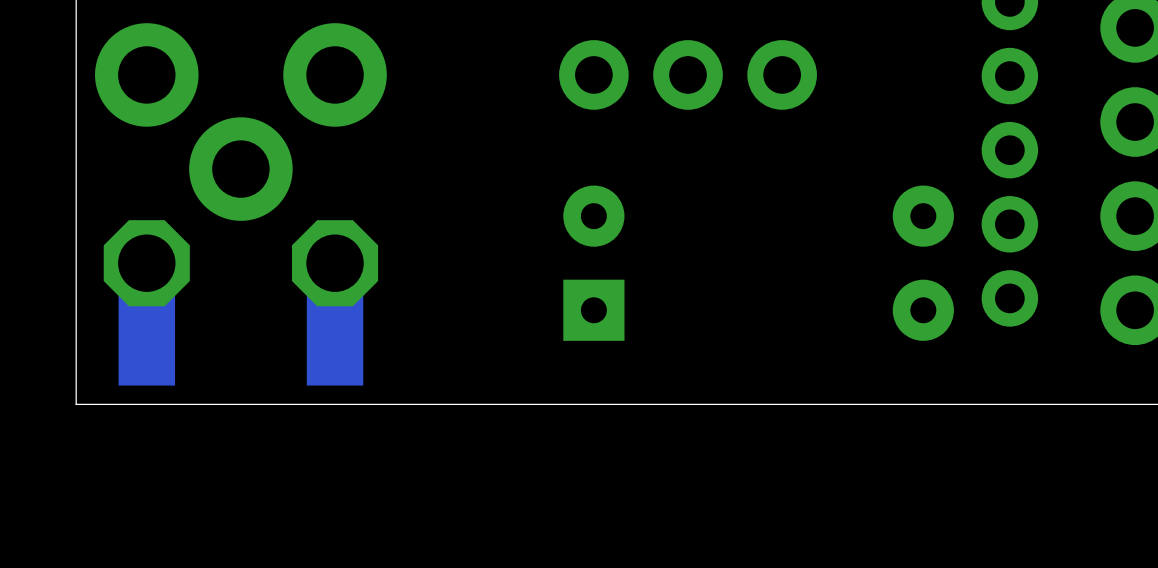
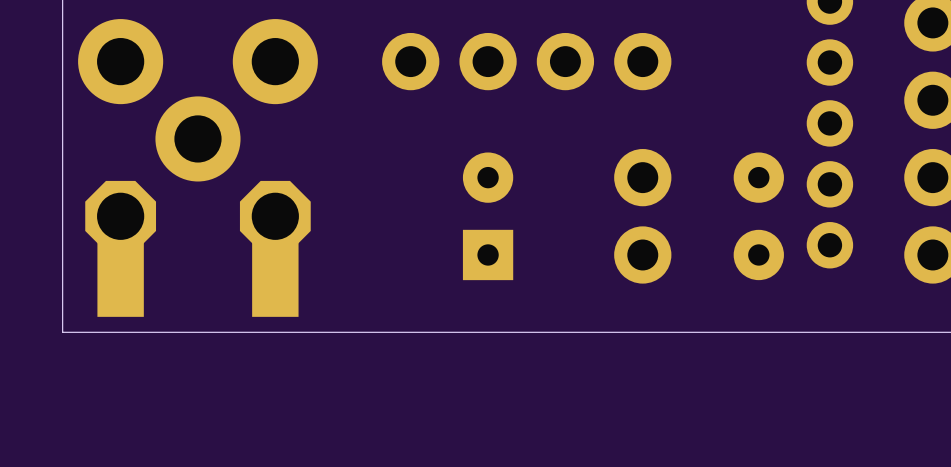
part: none -> (410, 61)
part: none -> (642, 177)
part: none -> (642, 254)

